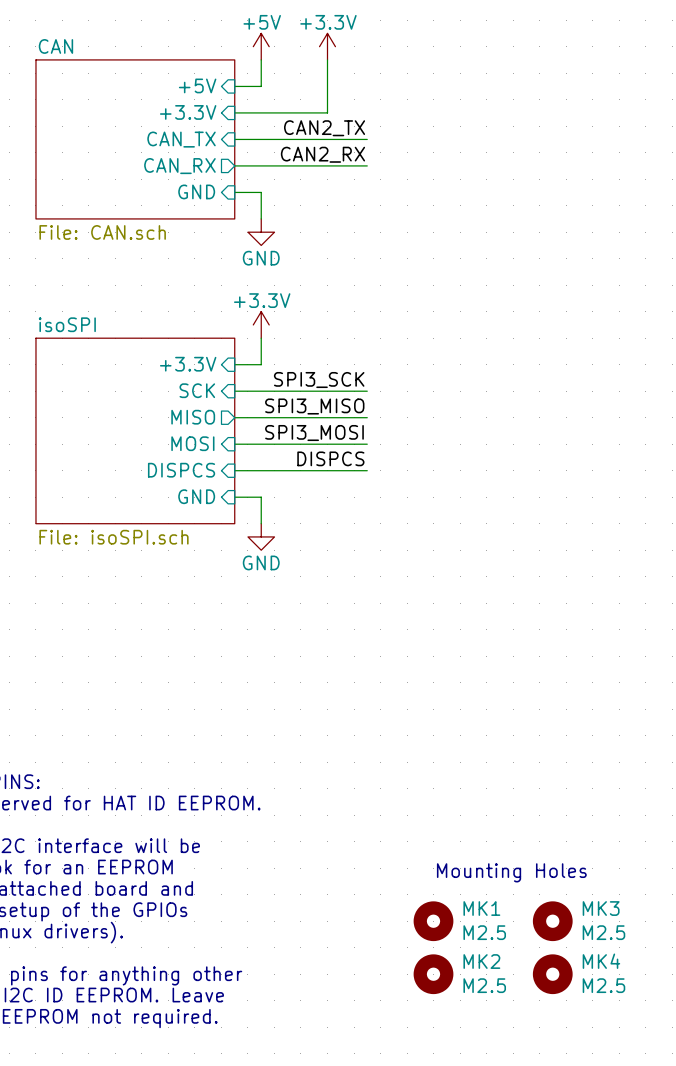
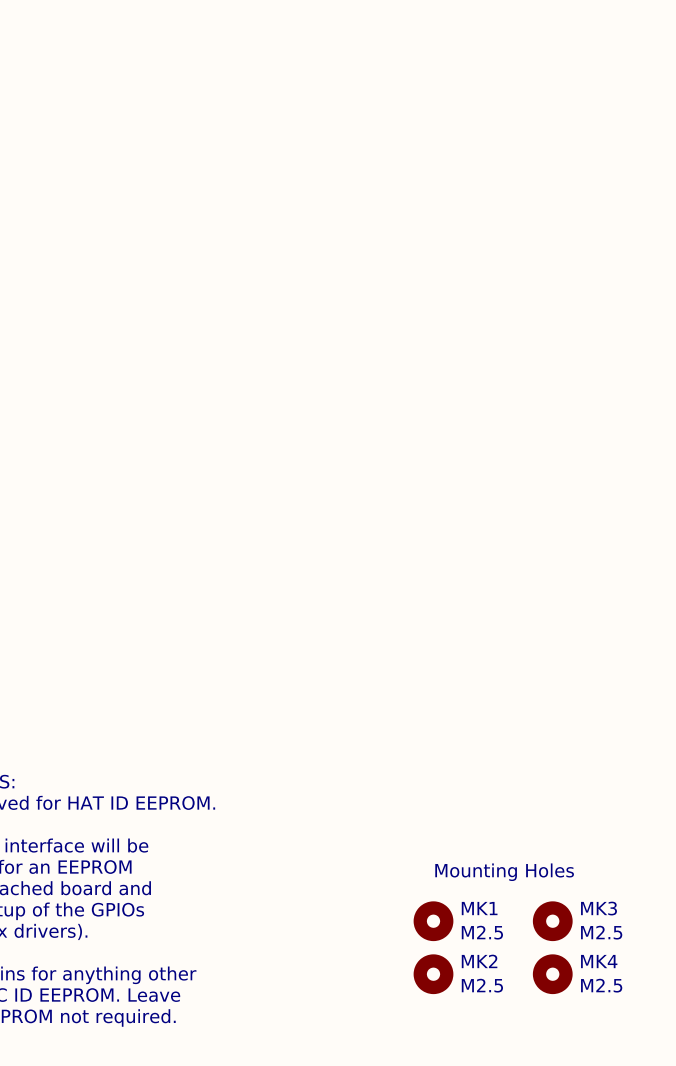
power symbol: +5V (261, 46) -> none
power symbol: +3.3V (327, 46) -> none
wire: (261, 59) (261, 86) (234, 86) -> none
wire: (327, 59) (327, 112) (234, 112) -> none
sheet pin: +5V (197, 85) -> none
sheet pin: +3.3V (188, 112) -> none
label: CAN2_TX (324, 128) -> none
sheet CAN: File: CAN.sch (135, 139) -> none
sheet pin: CAN_TX (181, 139) -> none
wire: (234, 139) (367, 139) -> none
label: CAN2_RX (322, 154) -> none
wire: (234, 165) (367, 165) -> none
sheet pin: CAN_RX (179, 166) -> none
sheet pin: GND (196, 191) -> none
wire: (234, 192) (261, 192) (261, 218) -> none
power symbol: GND (261, 232) -> none
power symbol: +3.3V (261, 324) -> none
wire: (261, 338) (261, 364) (234, 364) -> none
sheet pin: +3.3V (188, 364) -> none
label: SPI3_SCK (319, 380) -> none
sheet pin: SCK (197, 390) -> none
wire: (234, 391) (367, 391) -> none
label: SPI3_MISO (314, 406) -> none
sheet pin: MISO (193, 417) -> none
wire: (234, 417) (367, 417) -> none
sheet isoSPI: File: isoSPI.sch (135, 430) -> none
label: SPI3_MOSI (314, 433) -> none
sheet pin: MOSI (192, 443) -> none
wire: (234, 444) (367, 444) -> none
label: DISPCS (330, 458) -> none
sheet pin: DISPCS (181, 470) -> none
wire: (234, 470) (367, 470) -> none
sheet pin: GND (196, 496) -> none
wire: (234, 497) (261, 497) (261, 523) -> none
power symbol: GND (261, 536) -> none

